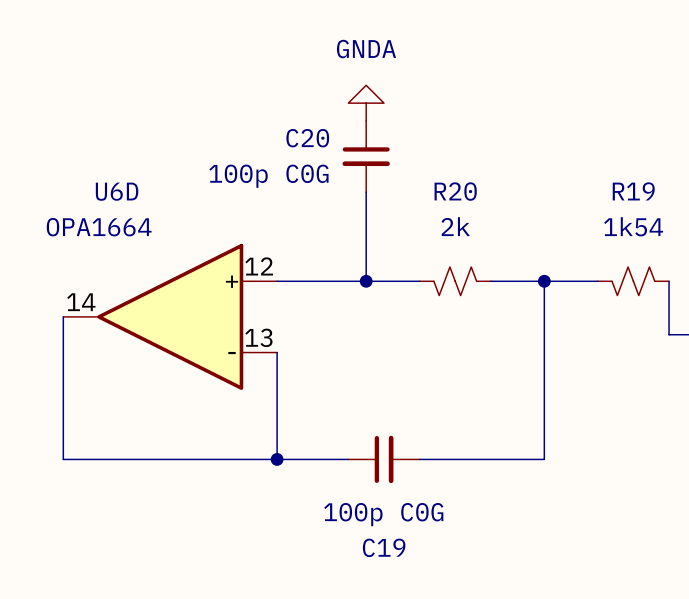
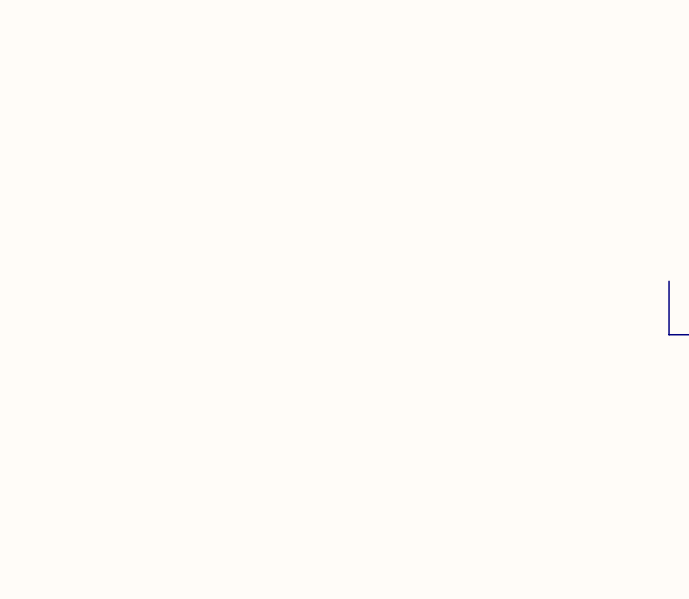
power symbol: GNDA (366, 103) -> none
C20: 100p C0G (366, 156) -> none
wire: (366, 192) (366, 281) -> none
wire: (277, 281) (419, 281) -> none
junction: (366, 281) -> none
R20: 2k (455, 281) -> none
wire: (490, 281) (597, 281) -> none
wire: (544, 281) (544, 459) (419, 459) -> none
junction: (544, 281) -> none
R19: 1k54 (633, 281) -> none
wire: (63, 316) (63, 459) (348, 459) -> none
U6D: OPA1664 (170, 316) -> none
wire: (277, 352) (277, 459) -> none
junction: (277, 459) -> none
C19: 100p C0G (383, 459) -> none

